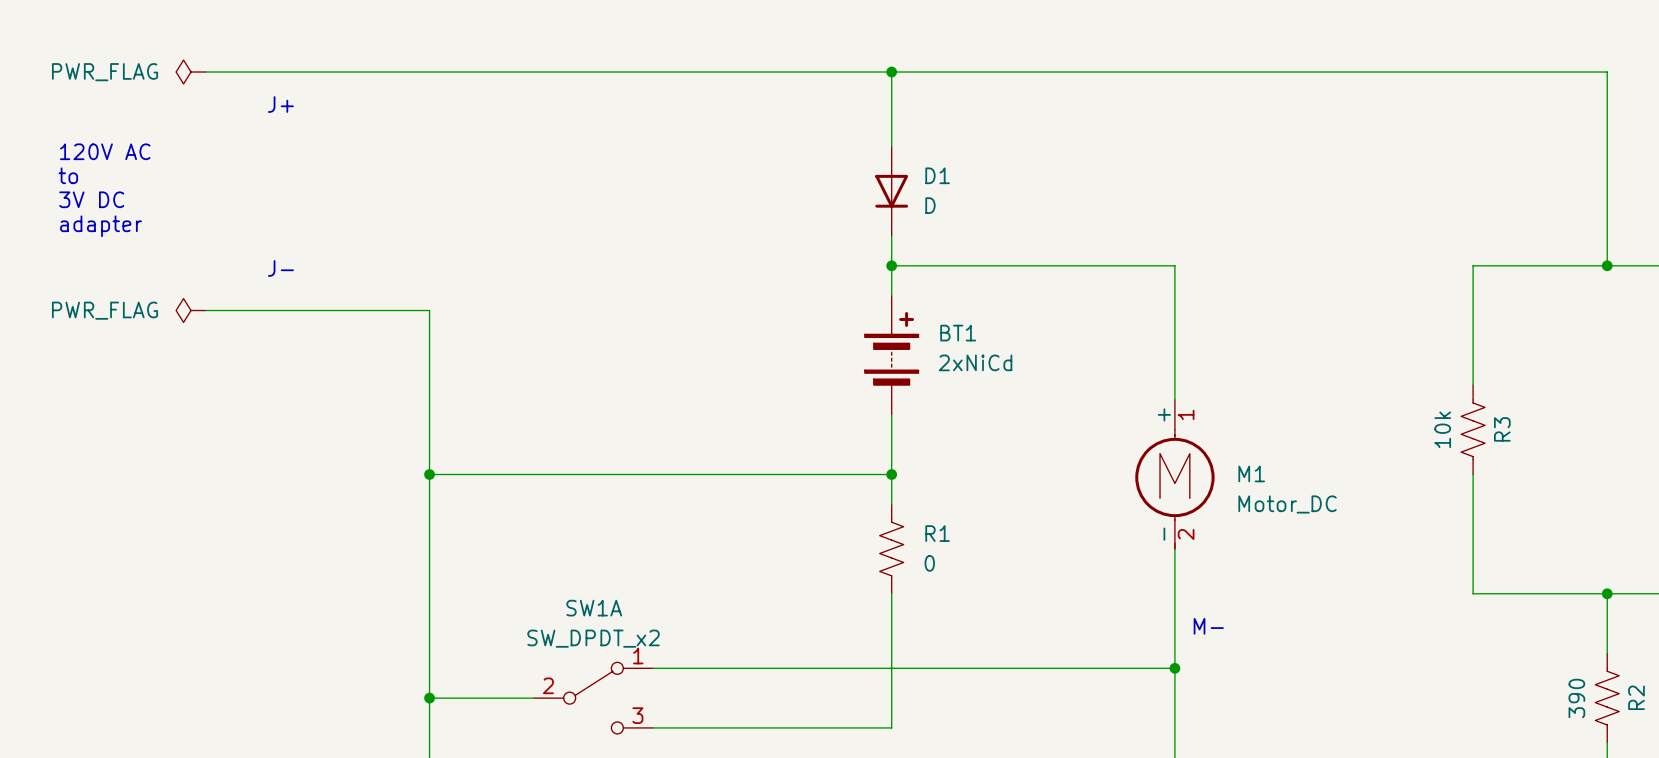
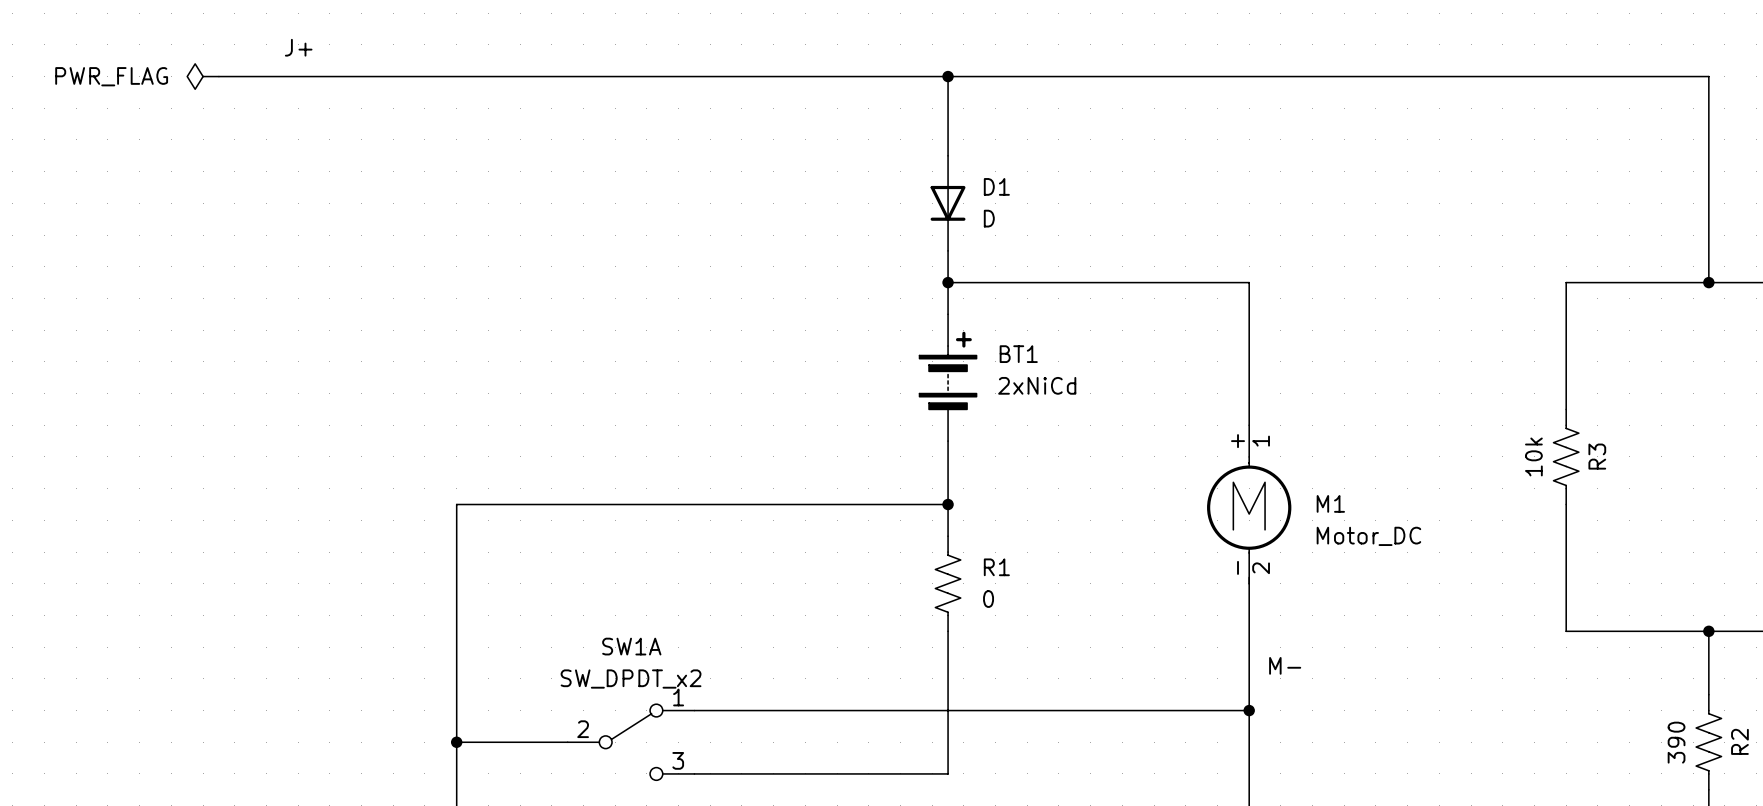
text position: J+ (280, 104) -> J+ (298, 47)
text: 120V AC (105, 151) -> none
text: to (68, 175) -> none
text: 3V DC (91, 199) -> none
text: adapter (100, 226) -> none
text: J- (280, 268) -> none
power symbol: PWR_FLAG (191, 310) -> none
wire: (205, 310) (429, 310) (429, 474) -> none
junction: (429, 474) -> none

